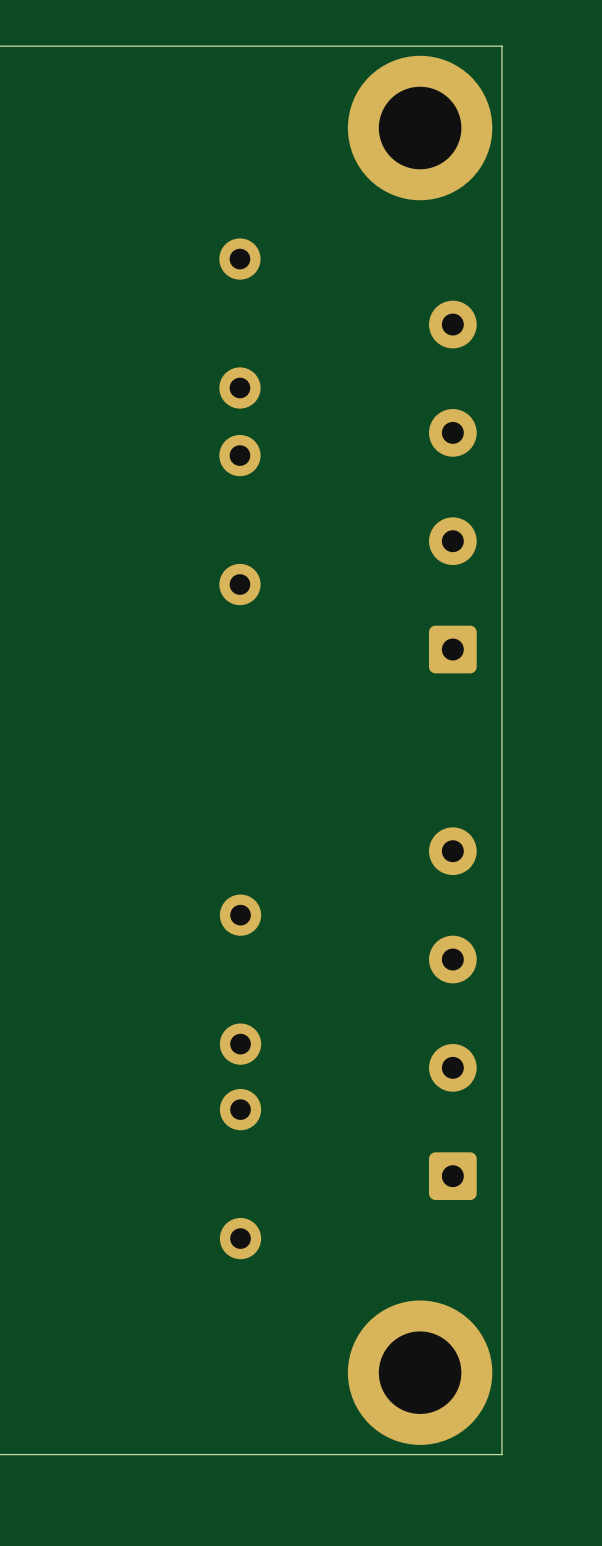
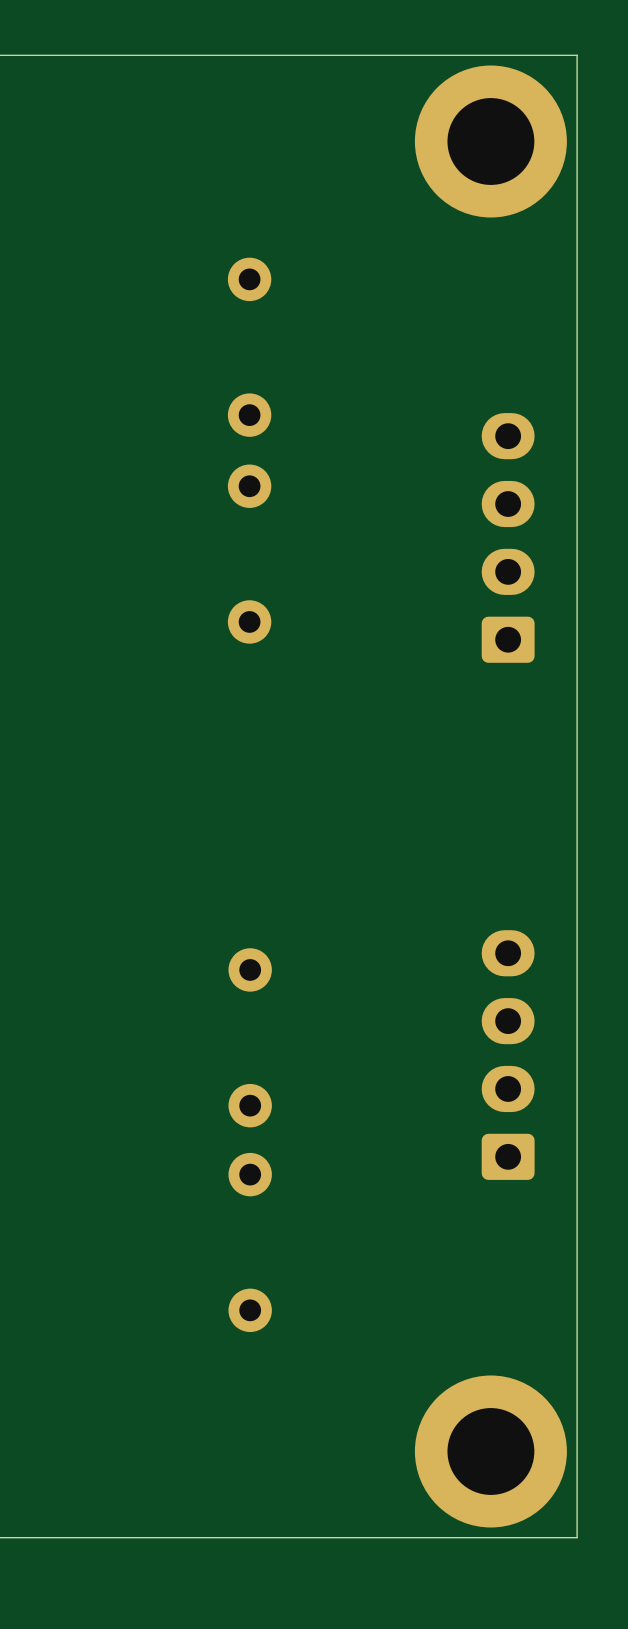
board edge: (501, 46) (501, 1454) -> (525, 55) (577, 55) (577, 1537) (525, 1537)
part position: (420, 128) -> (490, 141)
part: (452, 487) -> none
part: none -> (508, 537)
part: none -> (508, 1055)
part: (452, 1013) -> none
part position: (420, 1372) -> (490, 1451)

